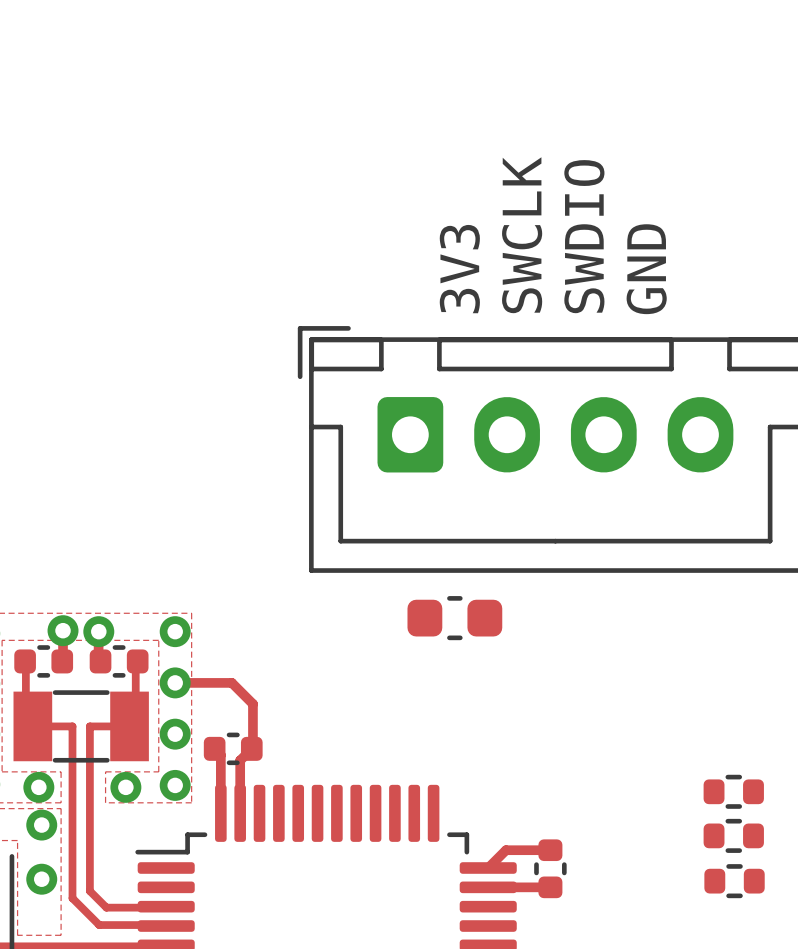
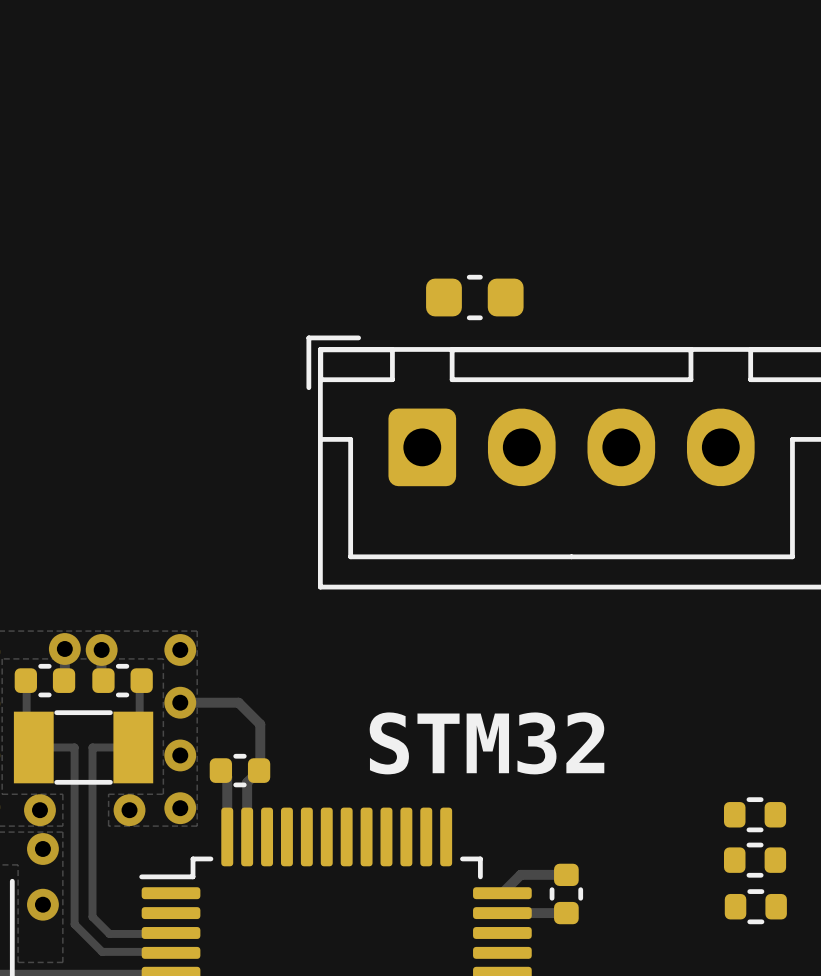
text: SWCLK (522, 235) -> none
text: SWDIO (584, 236) -> none
text: 3V3 (459, 269) -> none
text: GND (646, 269) -> none
part position: (454, 618) -> (474, 297)
text: none -> STM32 (487, 743)

